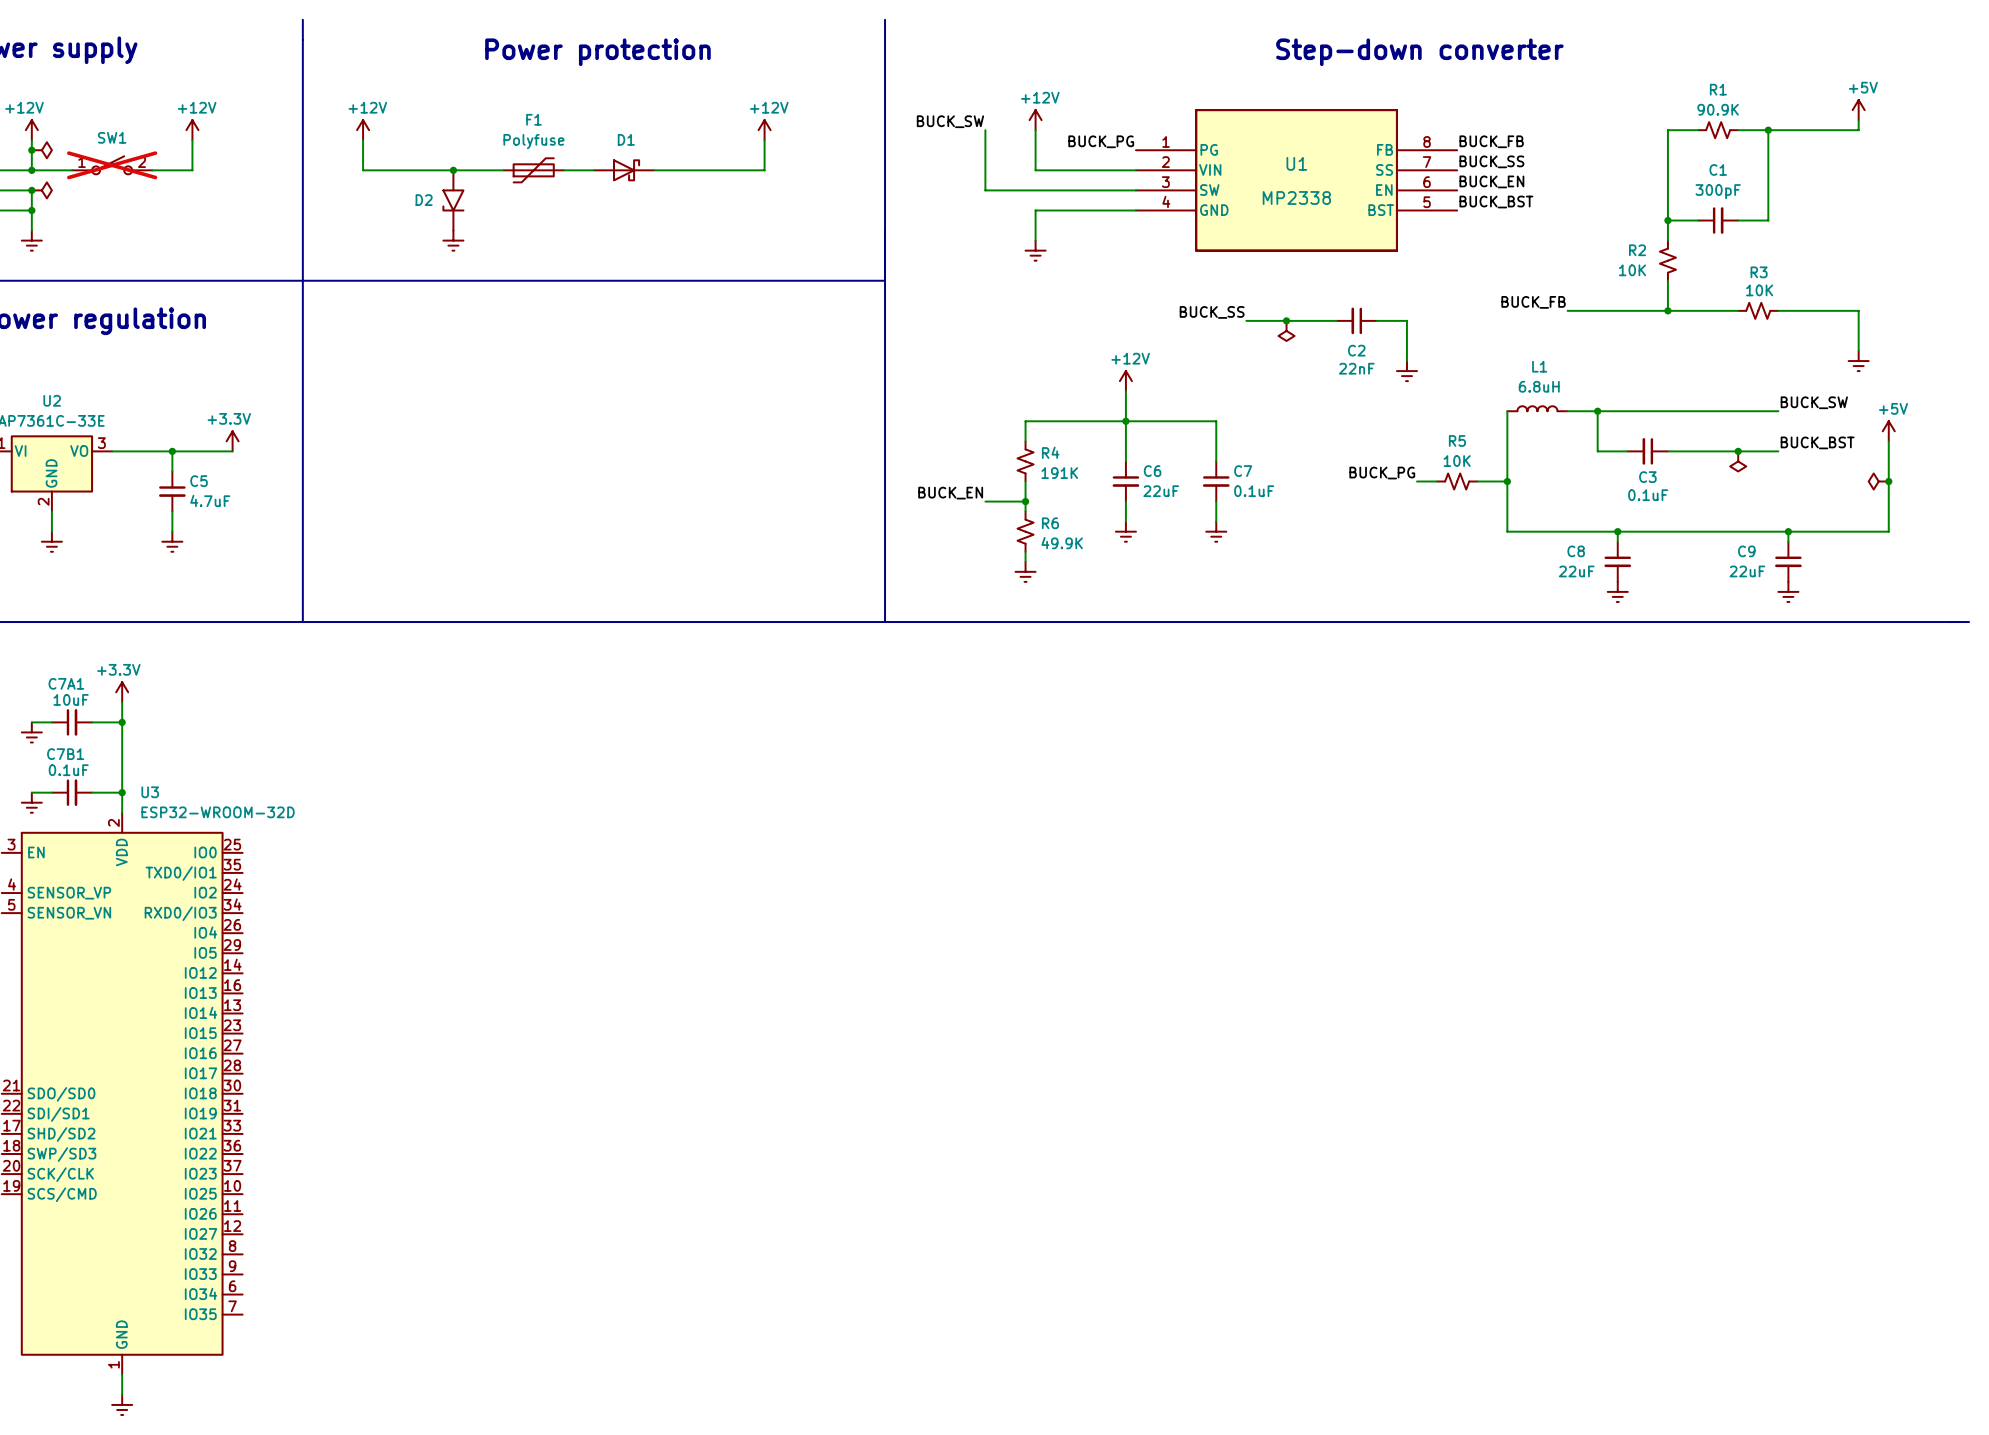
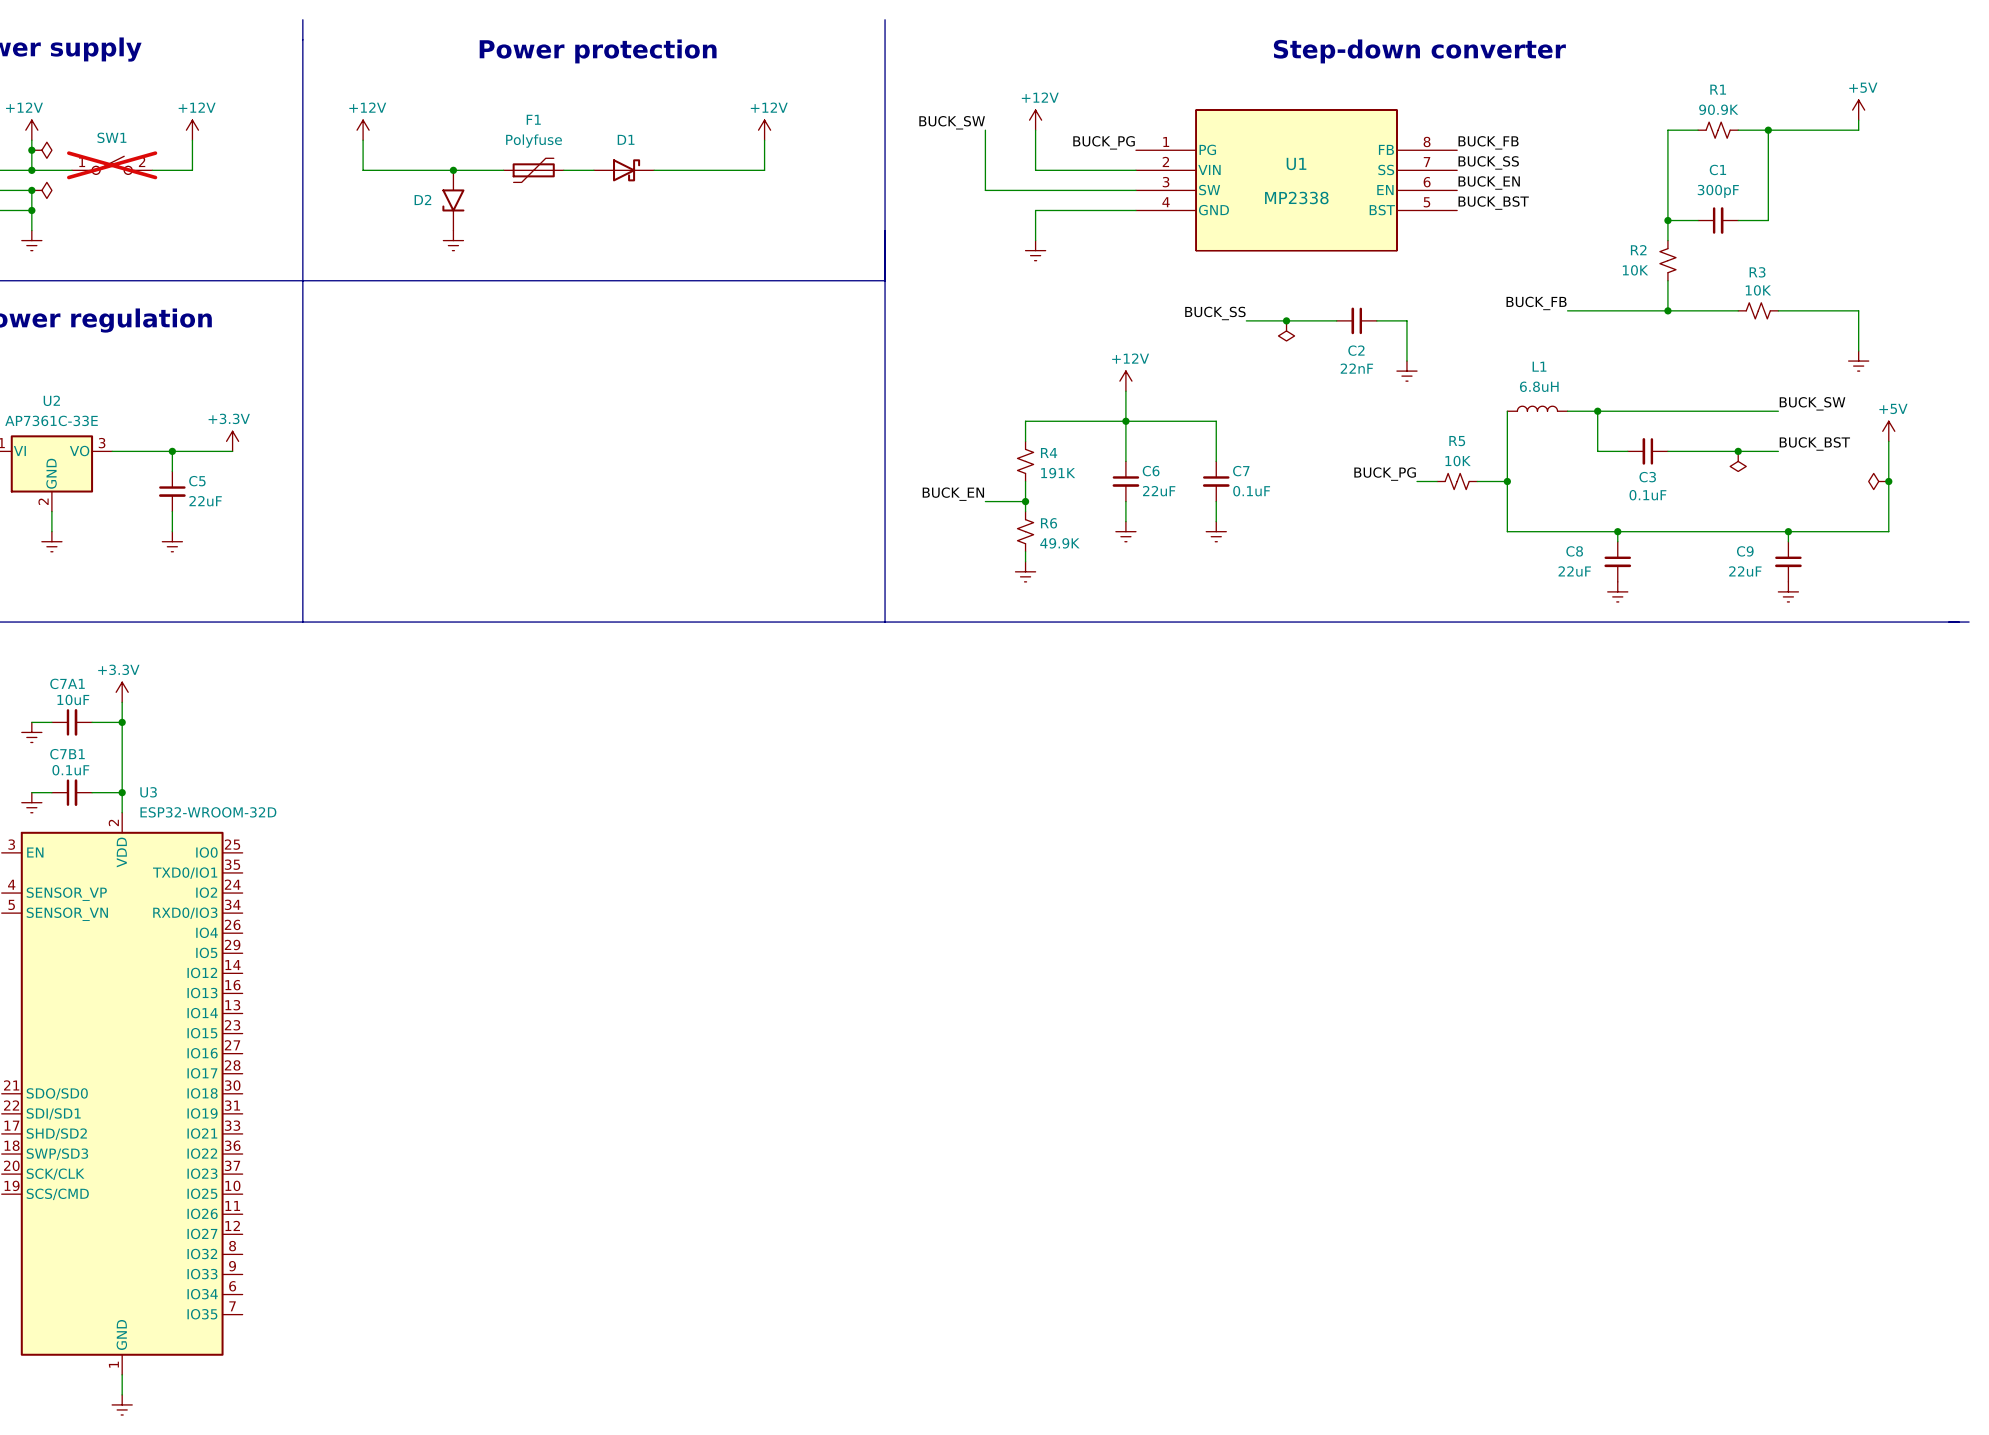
C5 value: 4.7uF (210, 500) -> 22uF (205, 501)

